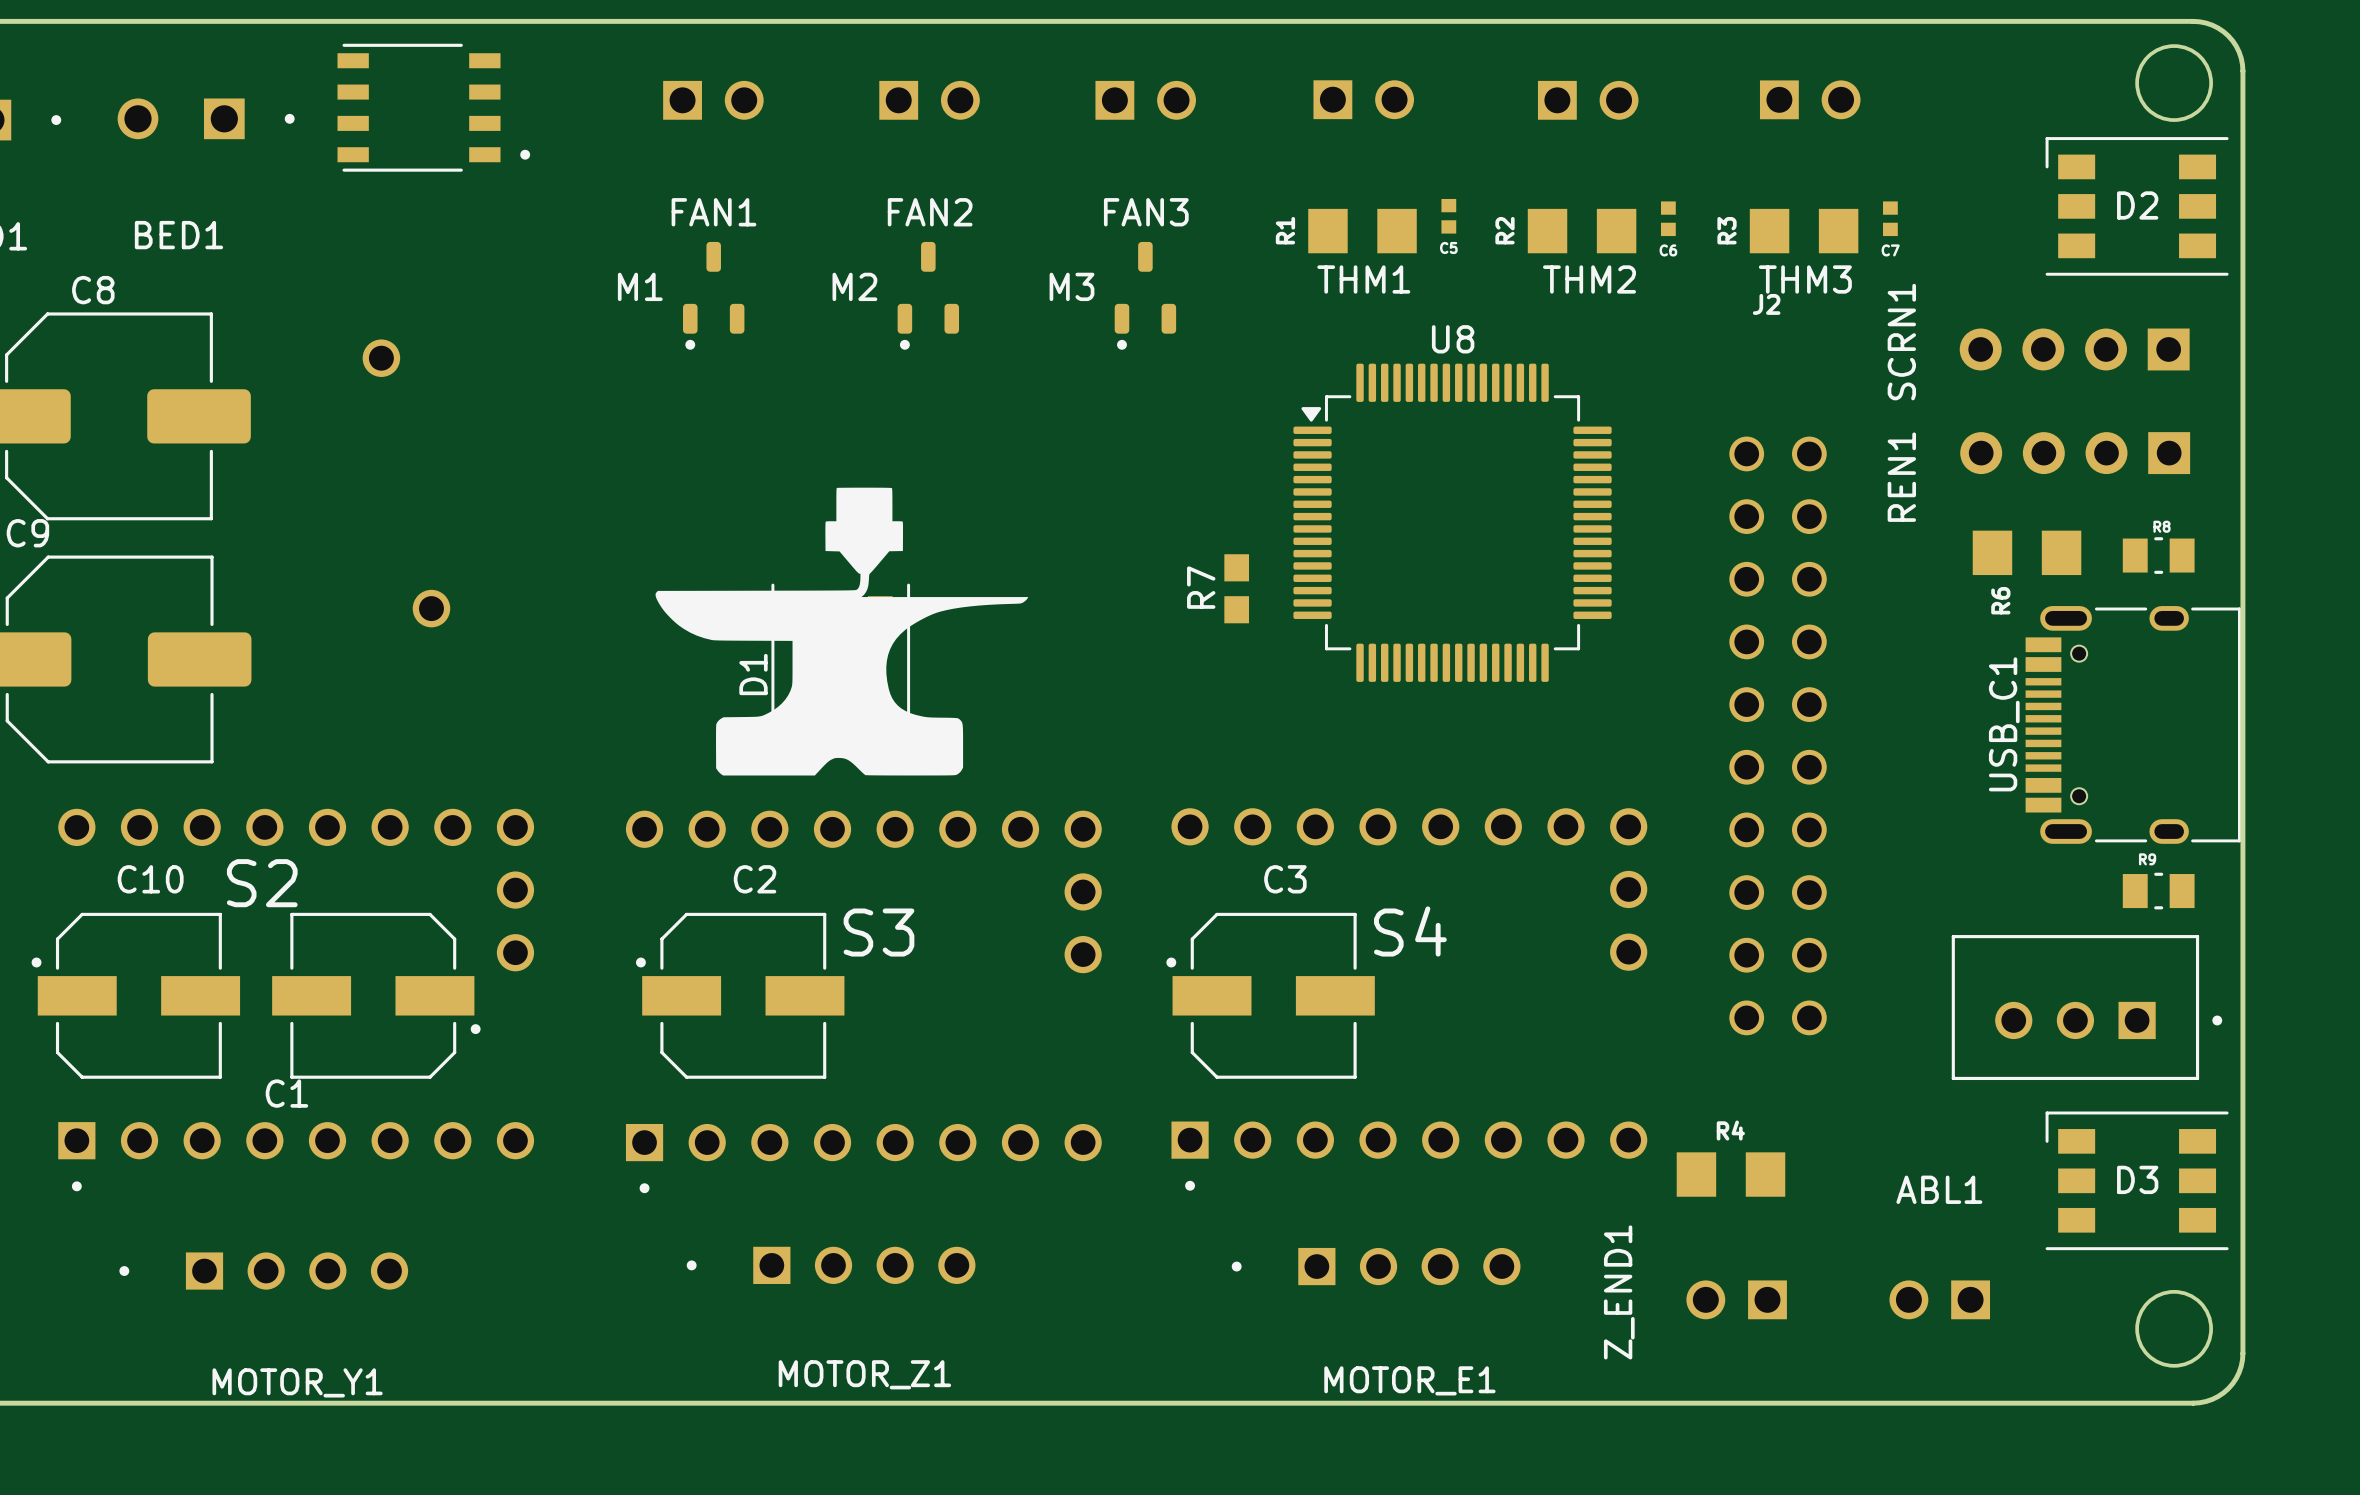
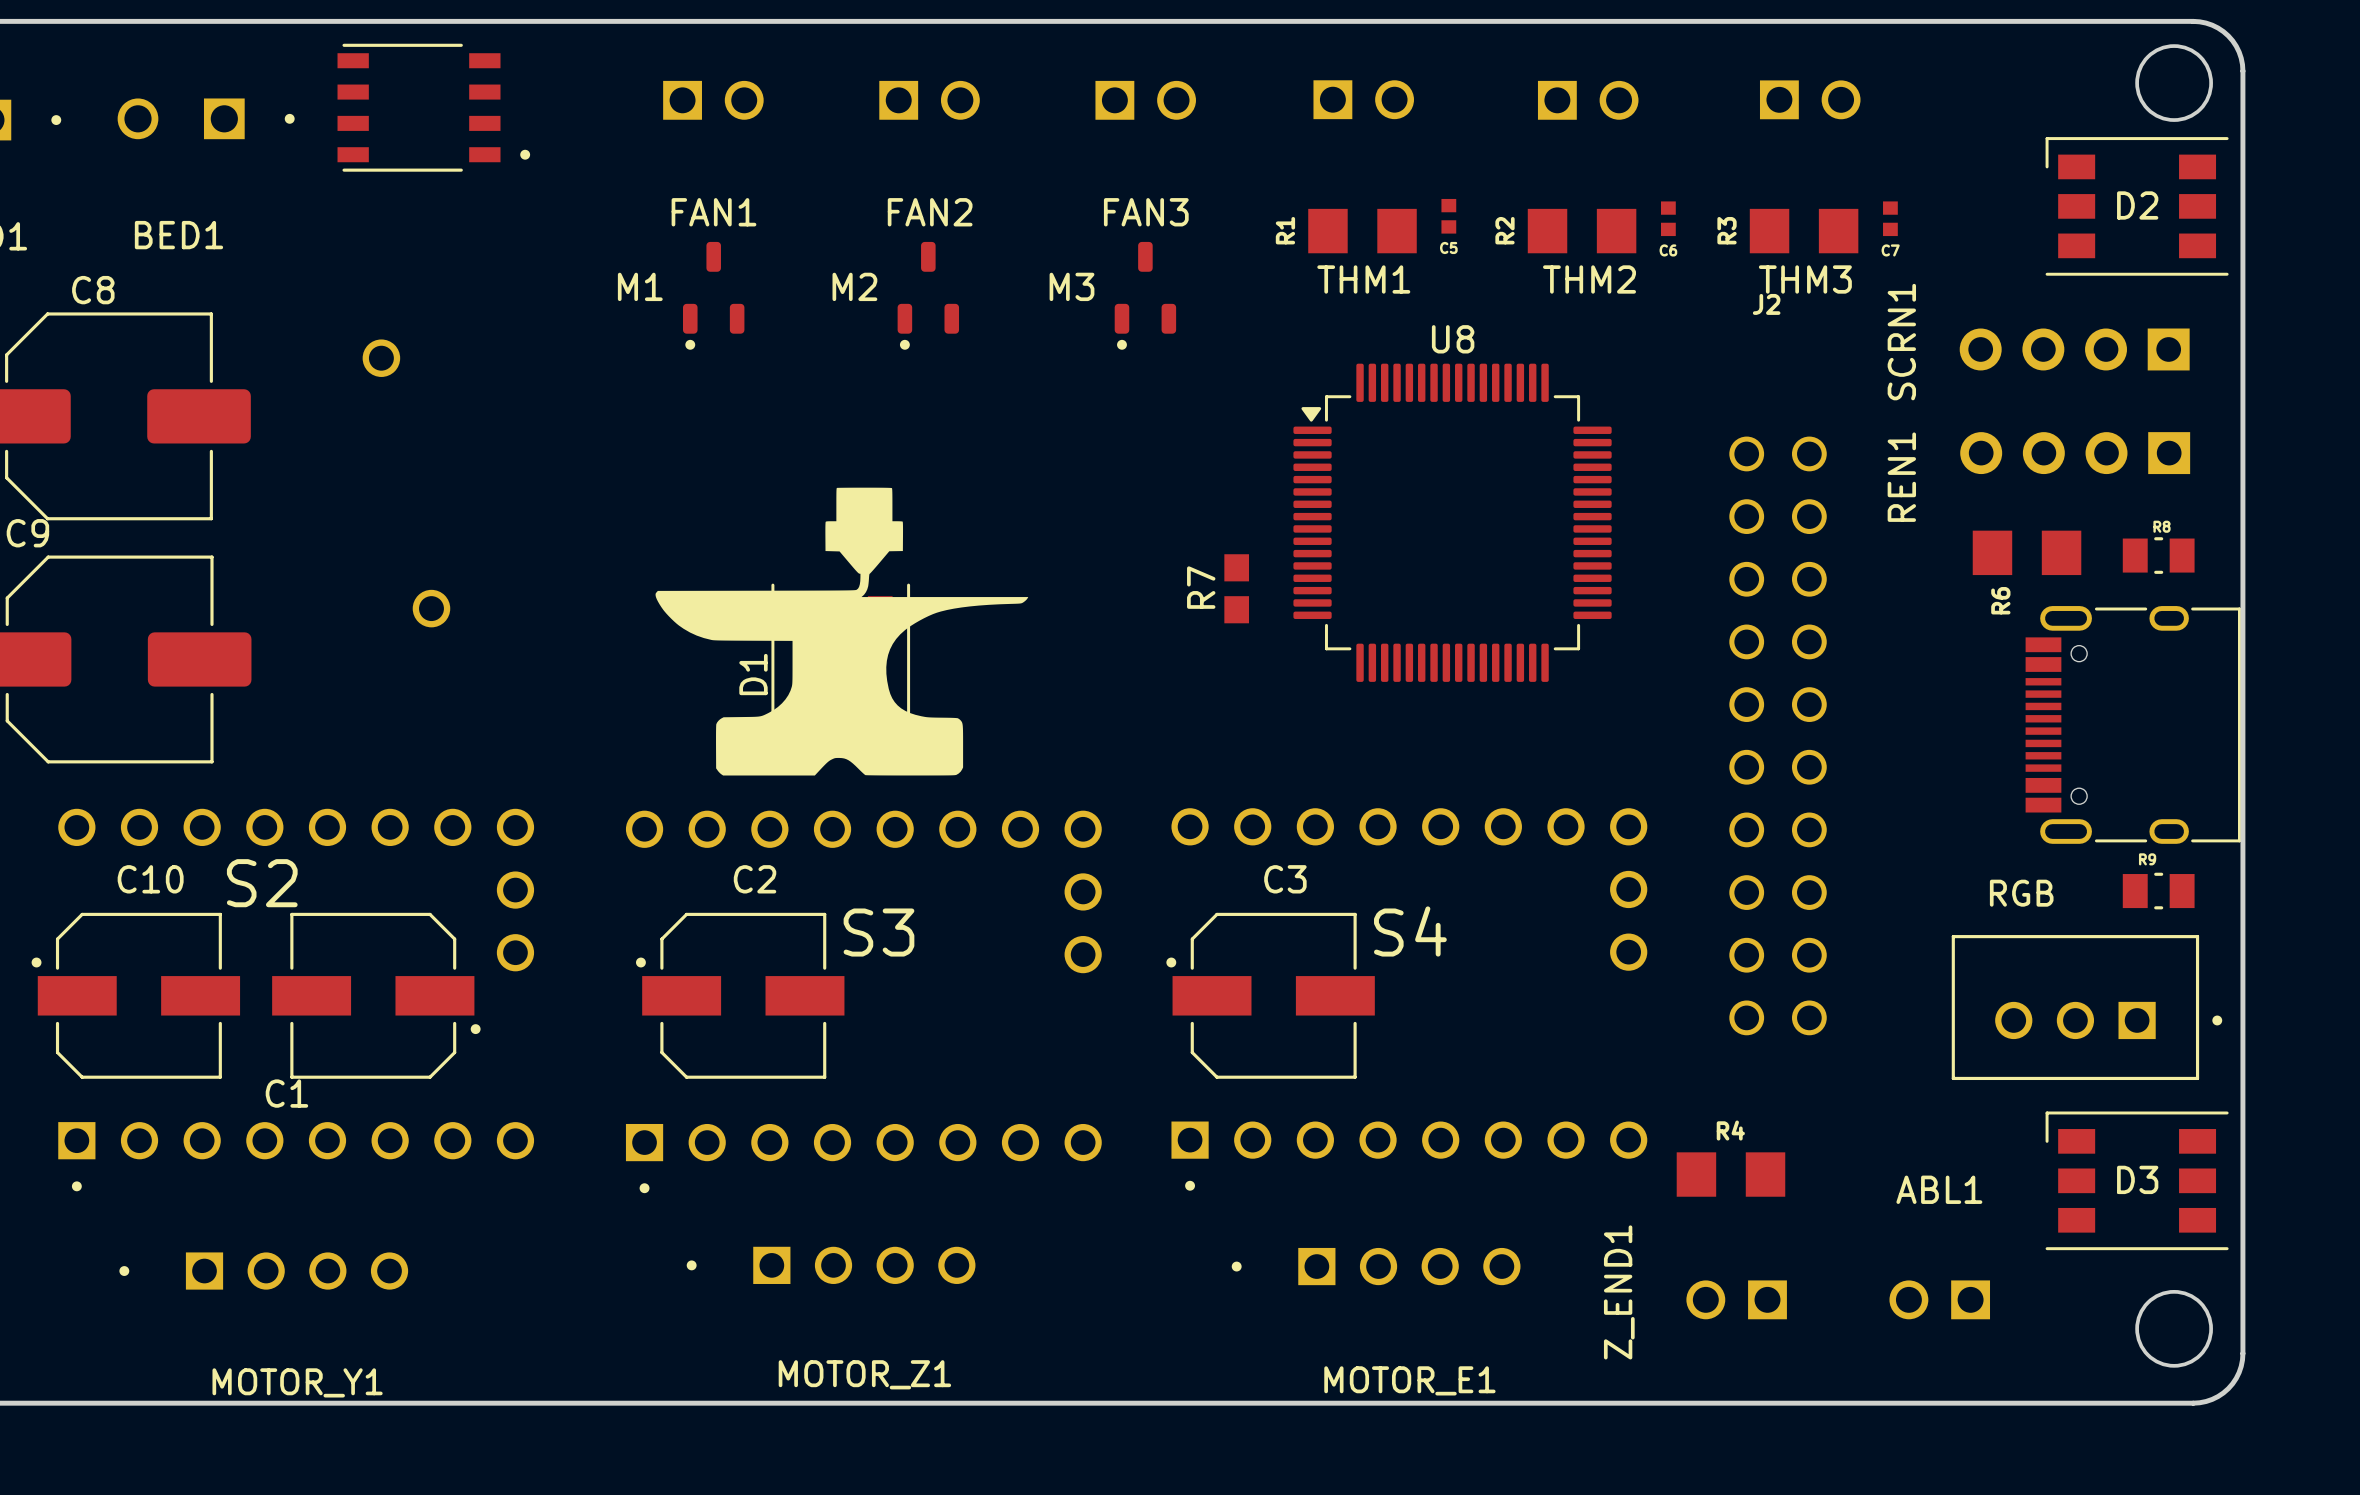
USB_C1 name: USB_C1 (2004, 724) -> none
RGB name: none -> RGB (2021, 893)

